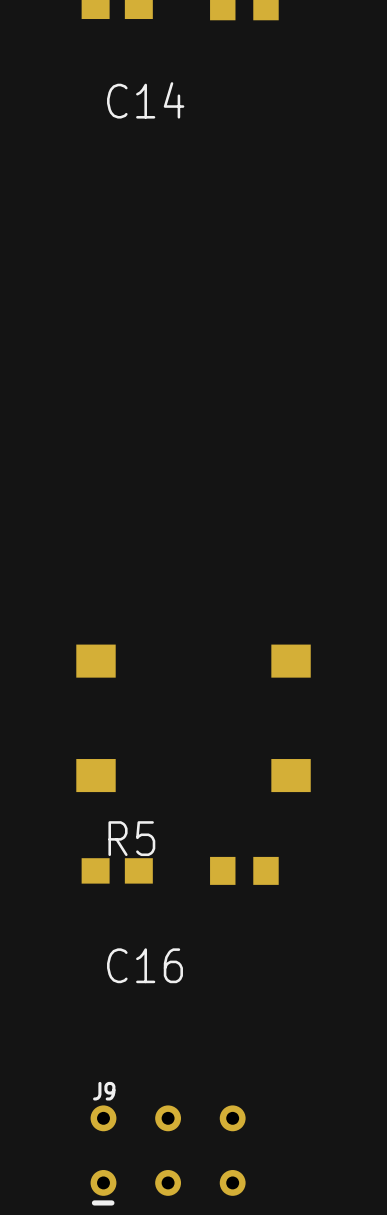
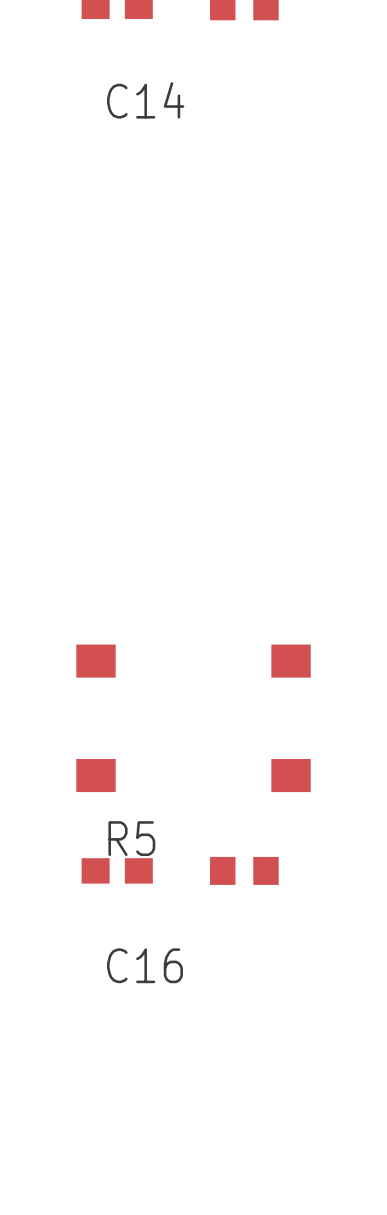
J9: (168, 1155) -> none

